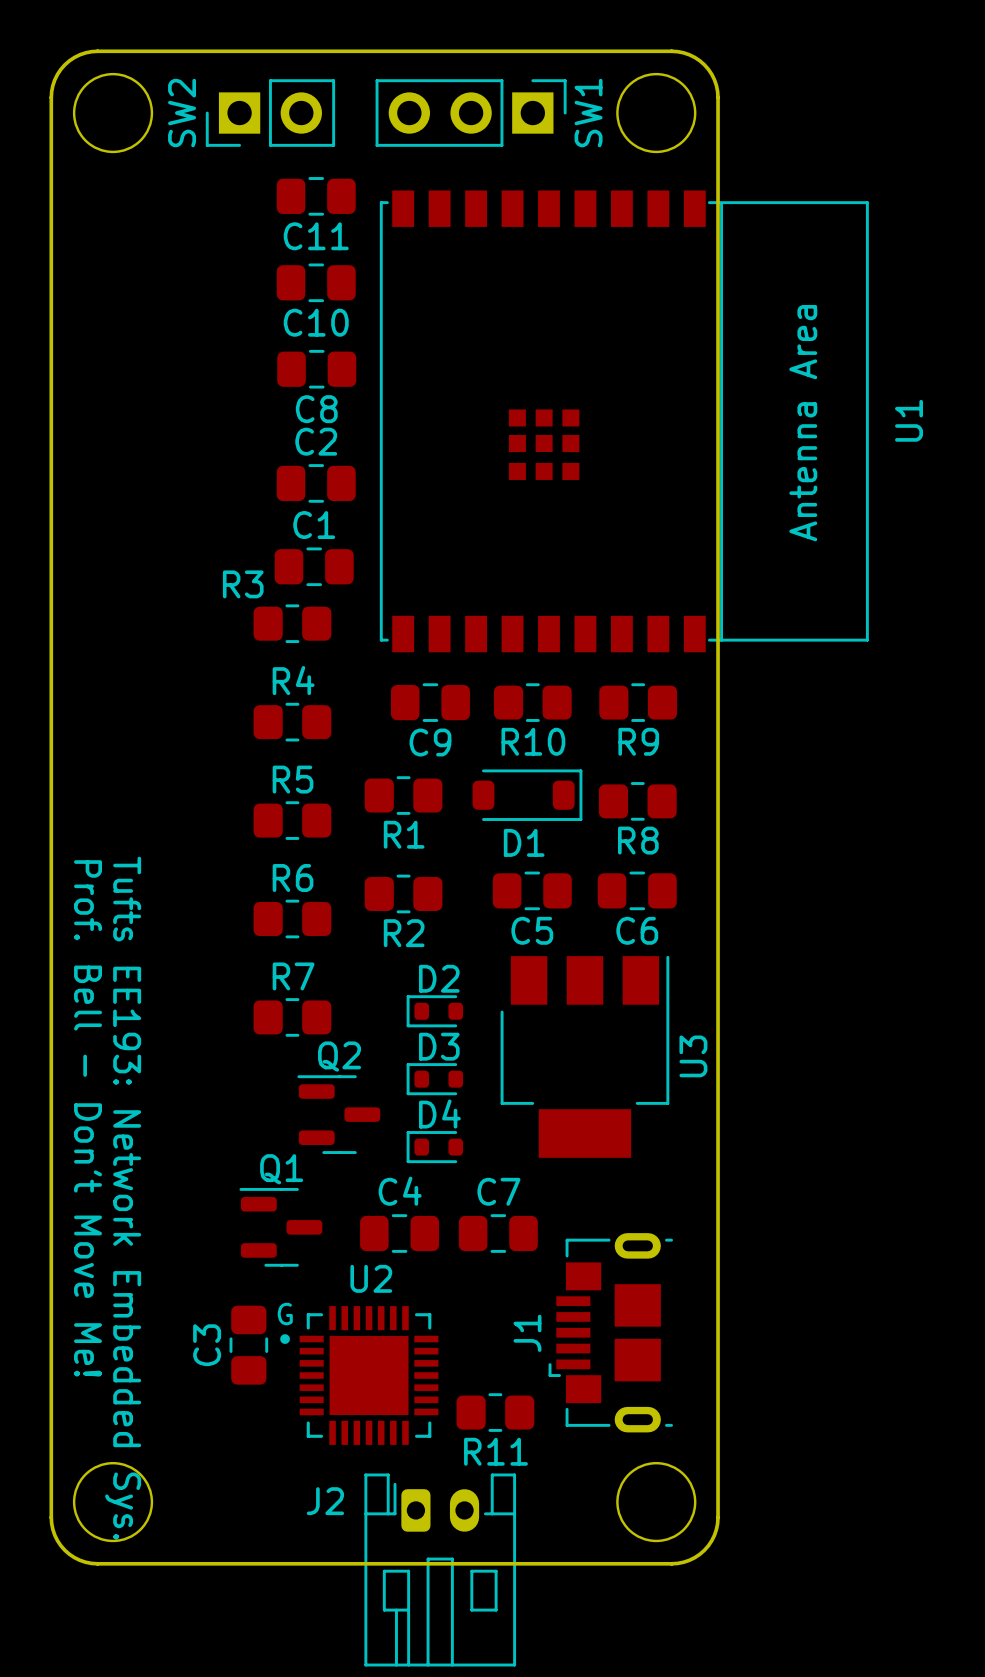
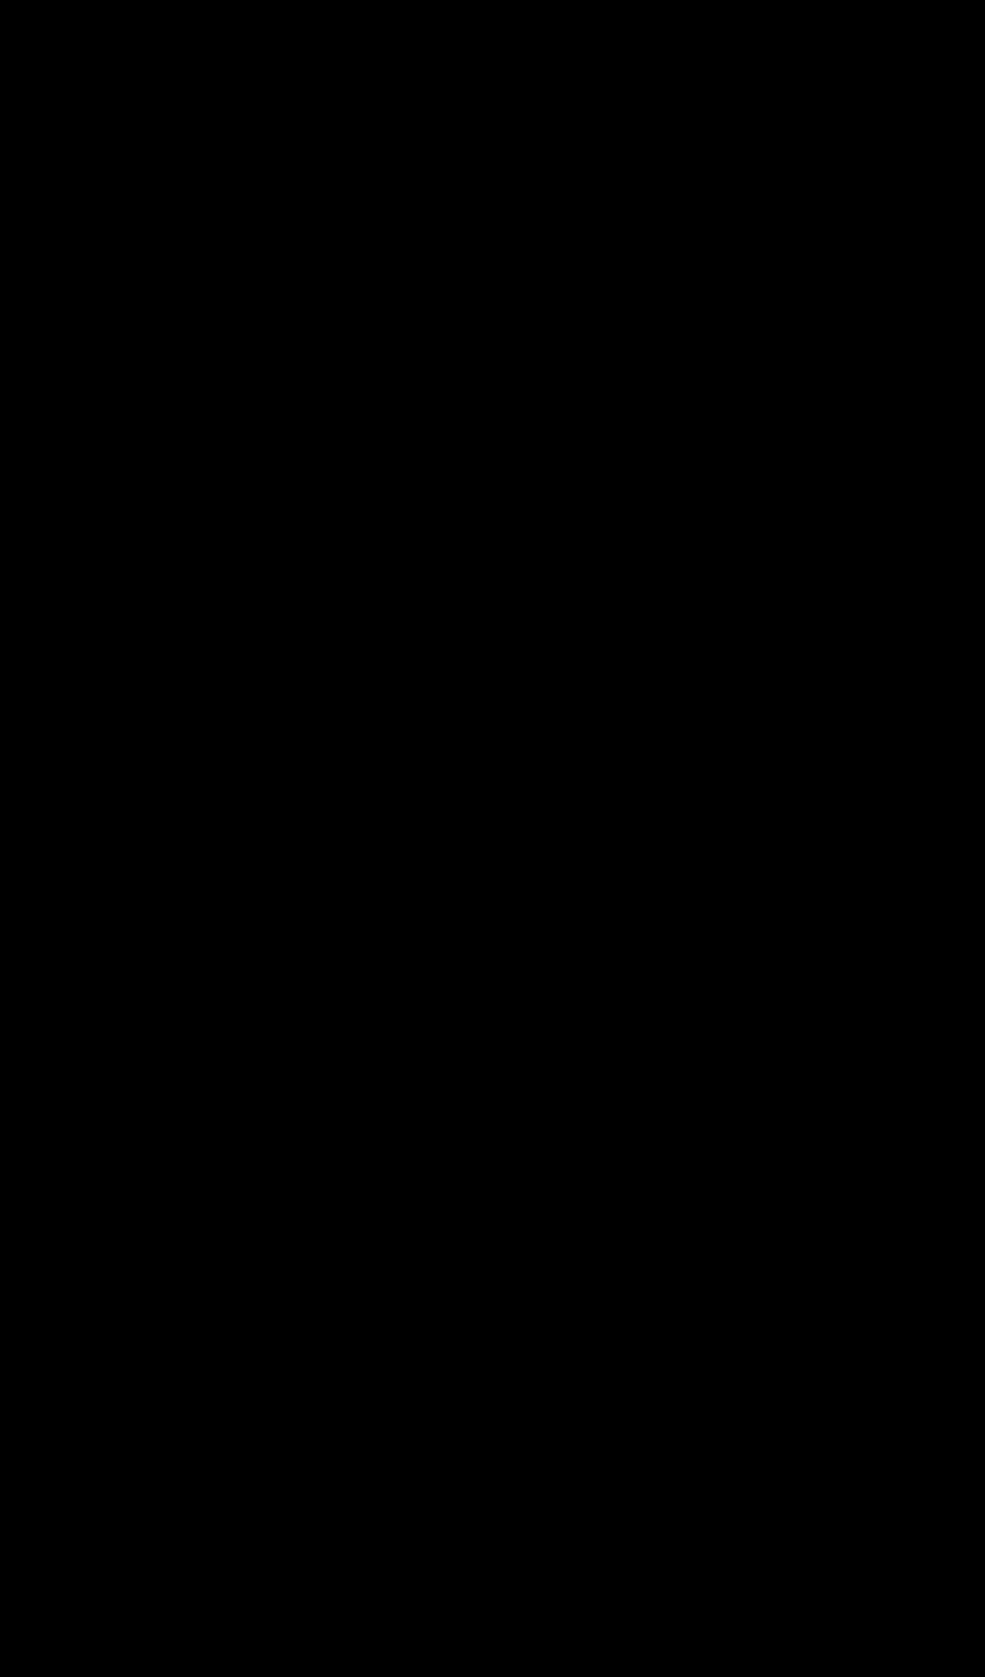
board edge: (97, 51) (671, 51) (683, 52) (694, 57) (704, 64) (714, 79) (718, 97) (718, 1517) (714, 1535) (708, 1545) (699, 1554) (689, 1560) (671, 1563) (97, 1563) (85, 1562) (69, 1554) (60, 1545) (54, 1535) (51, 1517) (51, 97) (54, 79) (64, 64) (79, 54) (97, 51) -> none
round board edge: [72, 72, 154, 154] -> none
round board edge: [616, 72, 697, 154] -> none
SW2: (270, 113) -> none
SW1: (471, 113) -> none
C11: (316, 196) -> none
C10: (316, 282) -> none
C8: (316, 369) -> none
U1: (624, 421) -> none
C2: (316, 483) -> none
C1: (314, 566) -> none
R3: (292, 623) -> none
C9: (430, 702) -> none
R10: (532, 702) -> none
R9: (638, 702) -> none
R4: (292, 722) -> none
R1: (403, 795) -> none
D1: (527, 795) -> none
R8: (637, 801) -> none
R5: (292, 820) -> none
C5: (532, 890) -> none
C6: (637, 890) -> none
R2: (403, 893) -> none
R6: (292, 919) -> none
D2: (434, 1011) -> none
R7: (292, 1017) -> none
U3: (584, 1056) -> none
D3: (434, 1079) -> none
Q2: (338, 1114) -> none
text: Prof. Bell - Don't Move Me! (88, 1118) -> none
D4: (434, 1147) -> none
text: Tufts EE193: Network Embedded Sys. (123, 1198) -> none
Q1: (280, 1227) -> none
C4: (399, 1233) -> none
C7: (498, 1233) -> none
text: G (285, 1314) -> none
J1: (610, 1332) -> none
C3: (248, 1345) -> none
U2: (359, 1375) -> none
R11: (495, 1412) -> none
round board edge: [72, 1461, 154, 1543] -> none
round board edge: [616, 1461, 697, 1543] -> none
J2: (440, 1569) -> none

